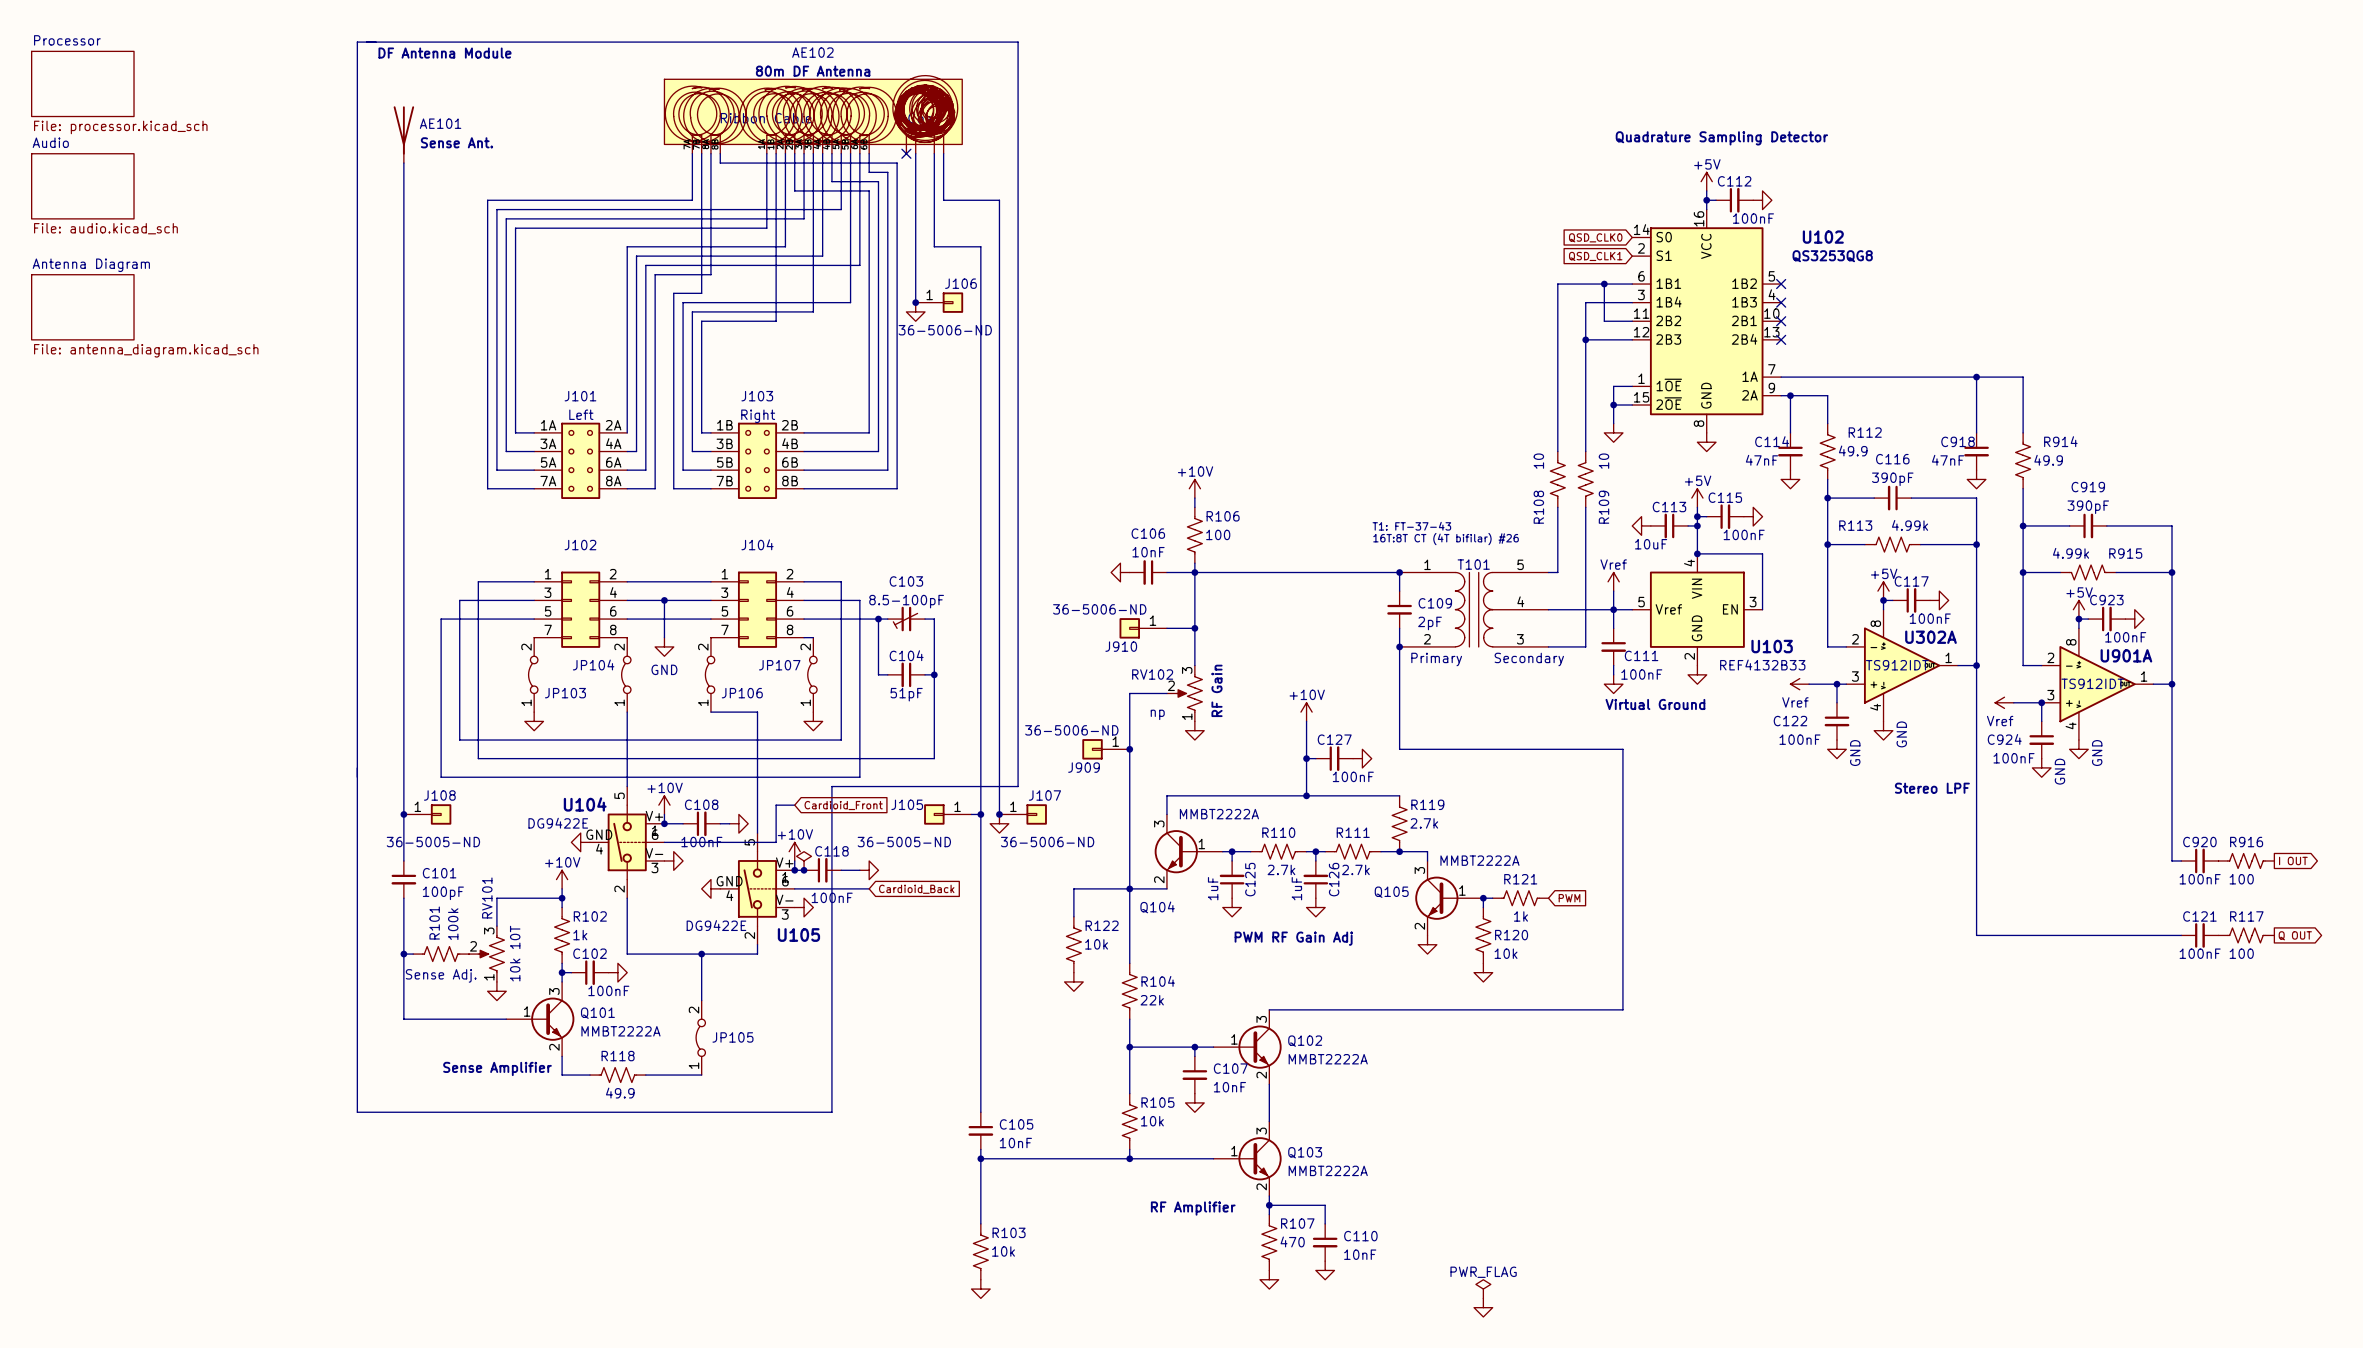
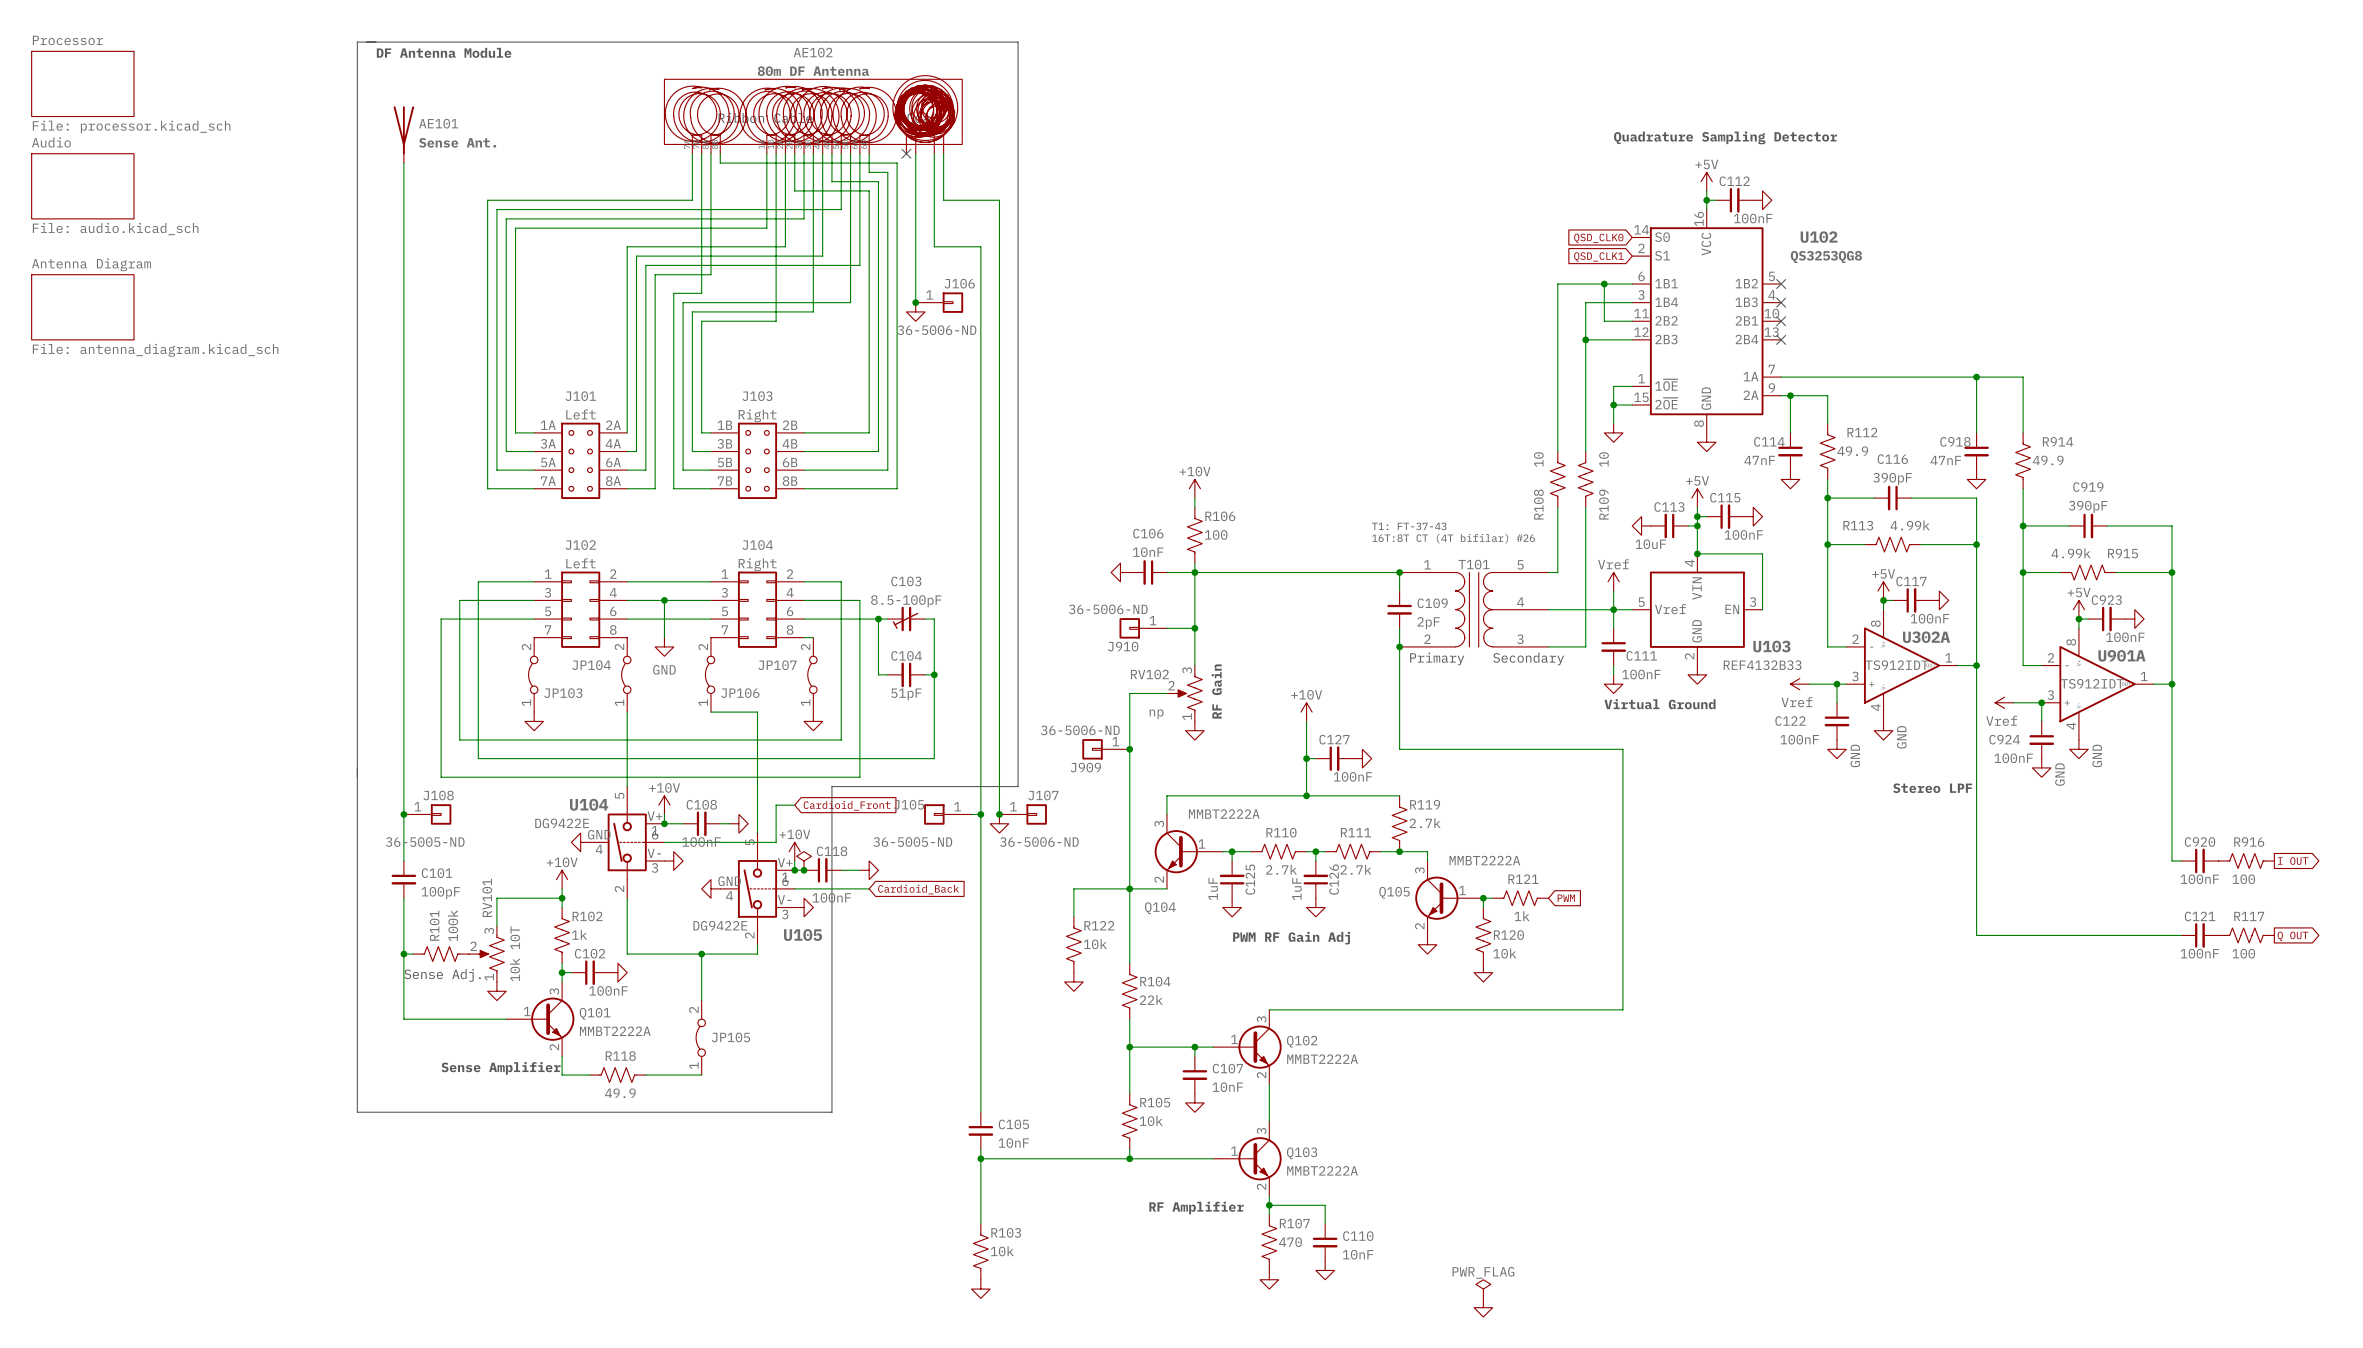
J102 value: none -> Left (581, 563)
J104 value: none -> Right (757, 564)

